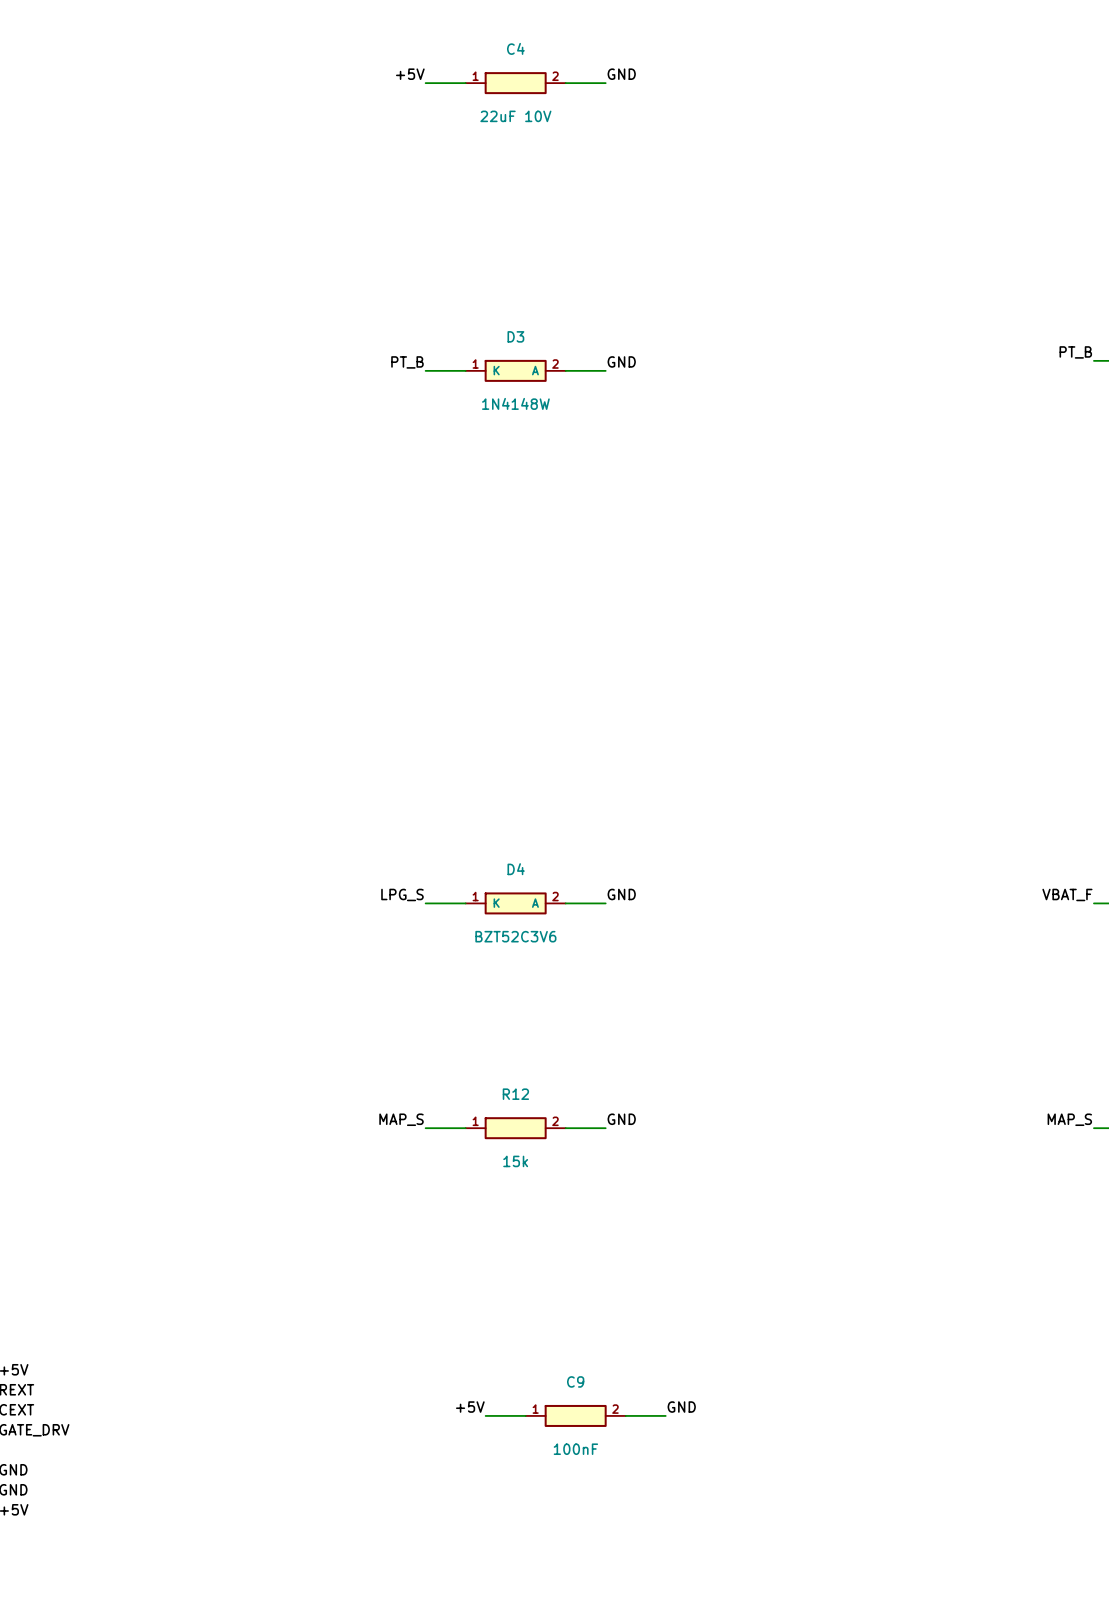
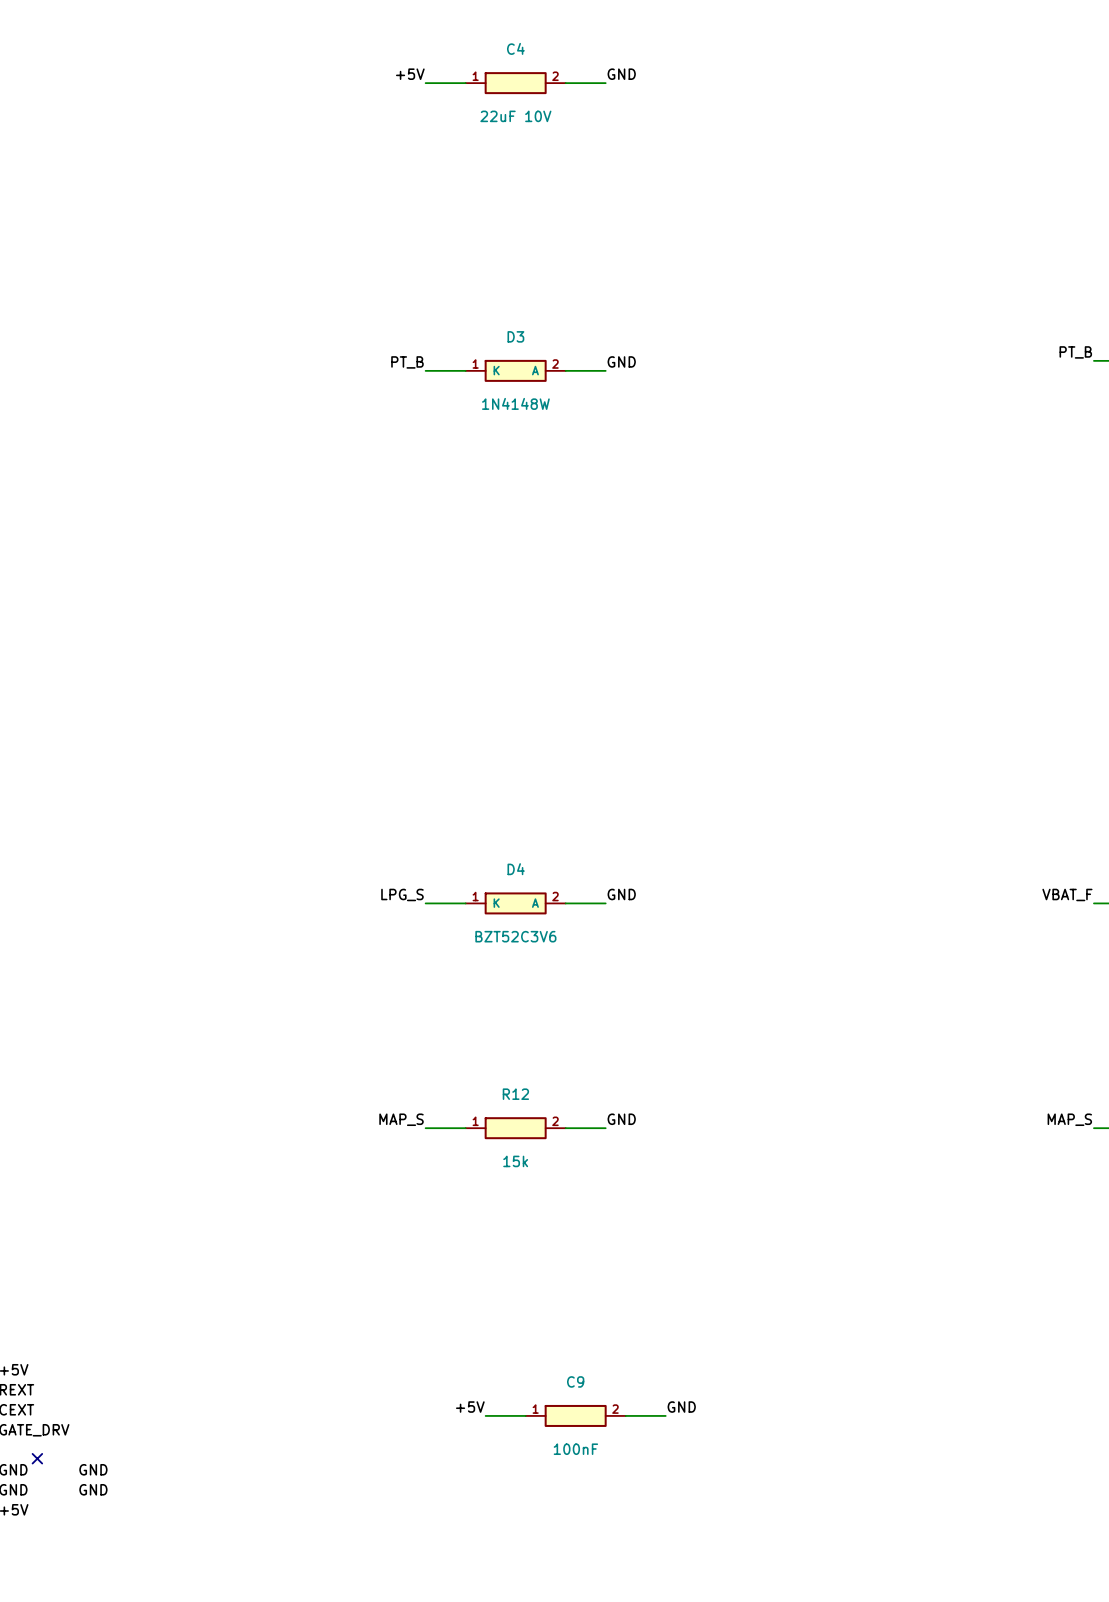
no-connect mark: none -> (37, 1458)
label: none -> GND (93, 1469)
label: none -> GND (93, 1489)

